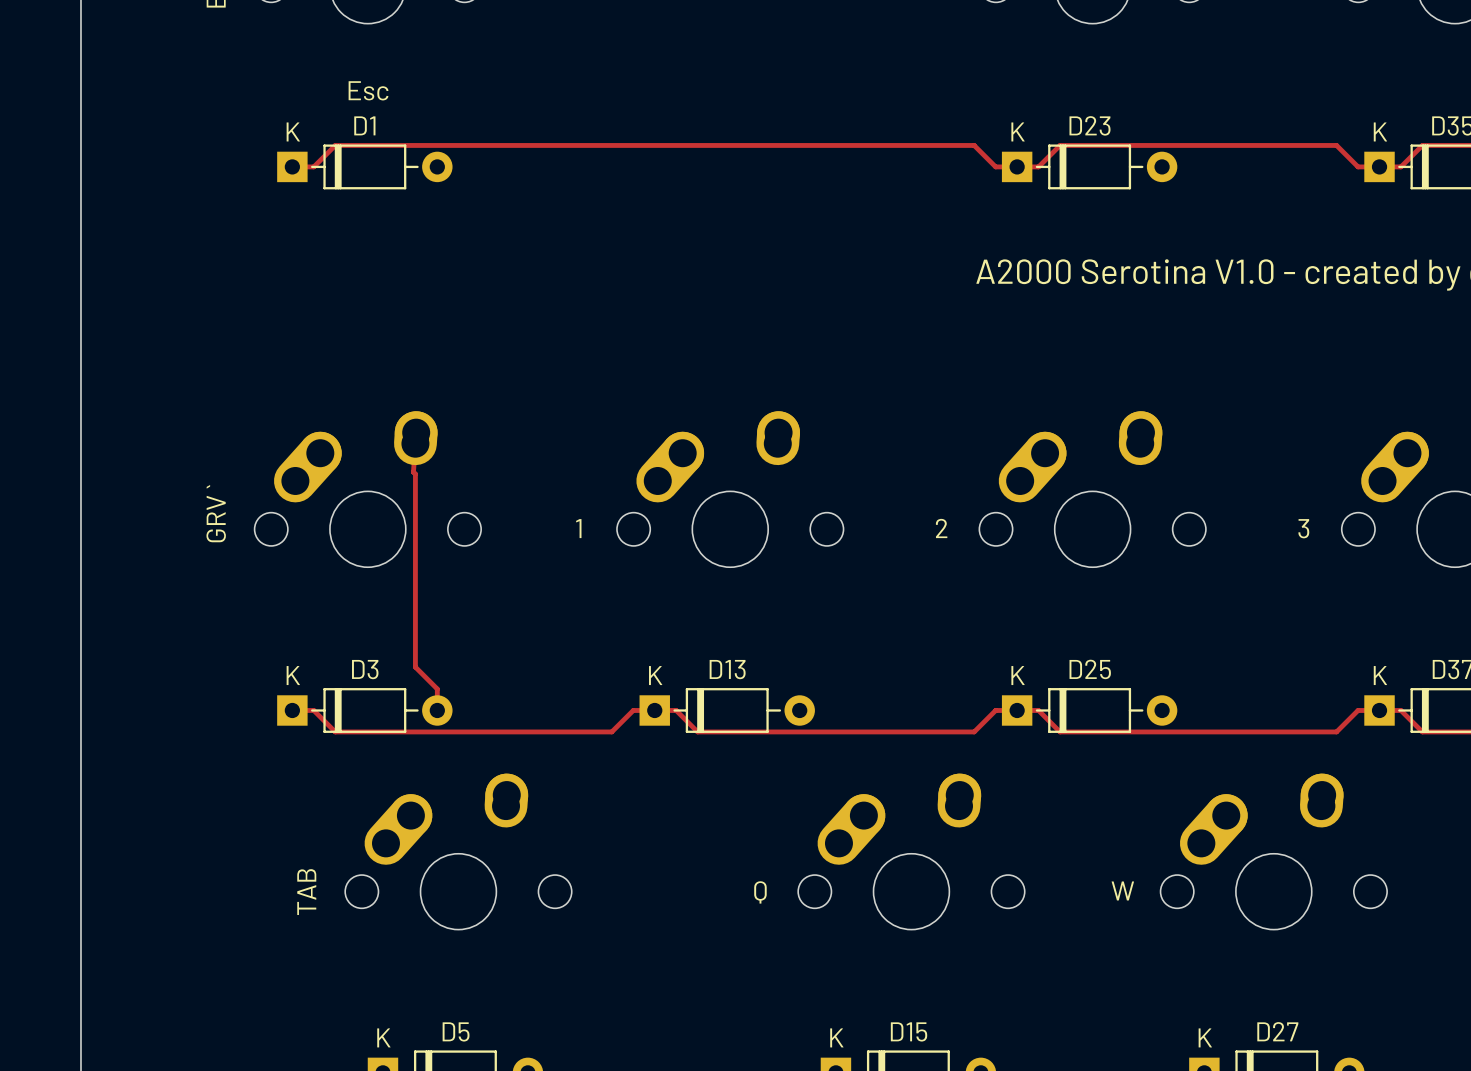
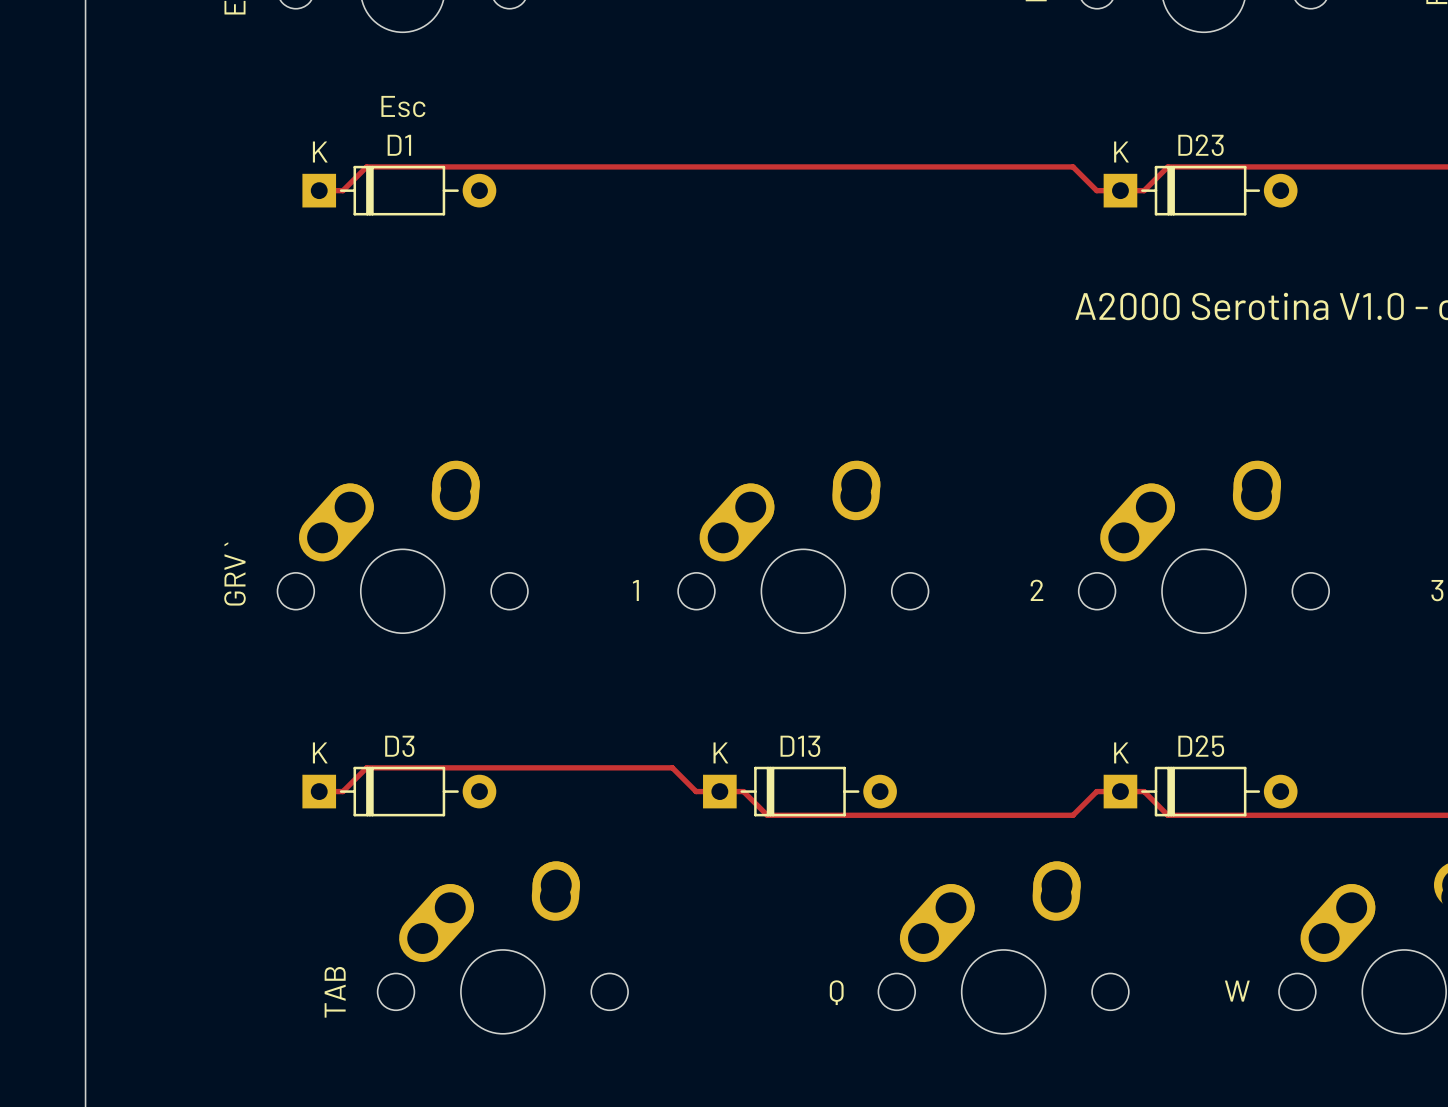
track: (415, 443) (413, 472) (415, 474) (415, 667) (437, 689) (437, 710) -> none
track: (313, 710) (335, 731) (611, 731) (633, 710) -> (342, 791) (366, 767) (672, 767) (696, 791)

